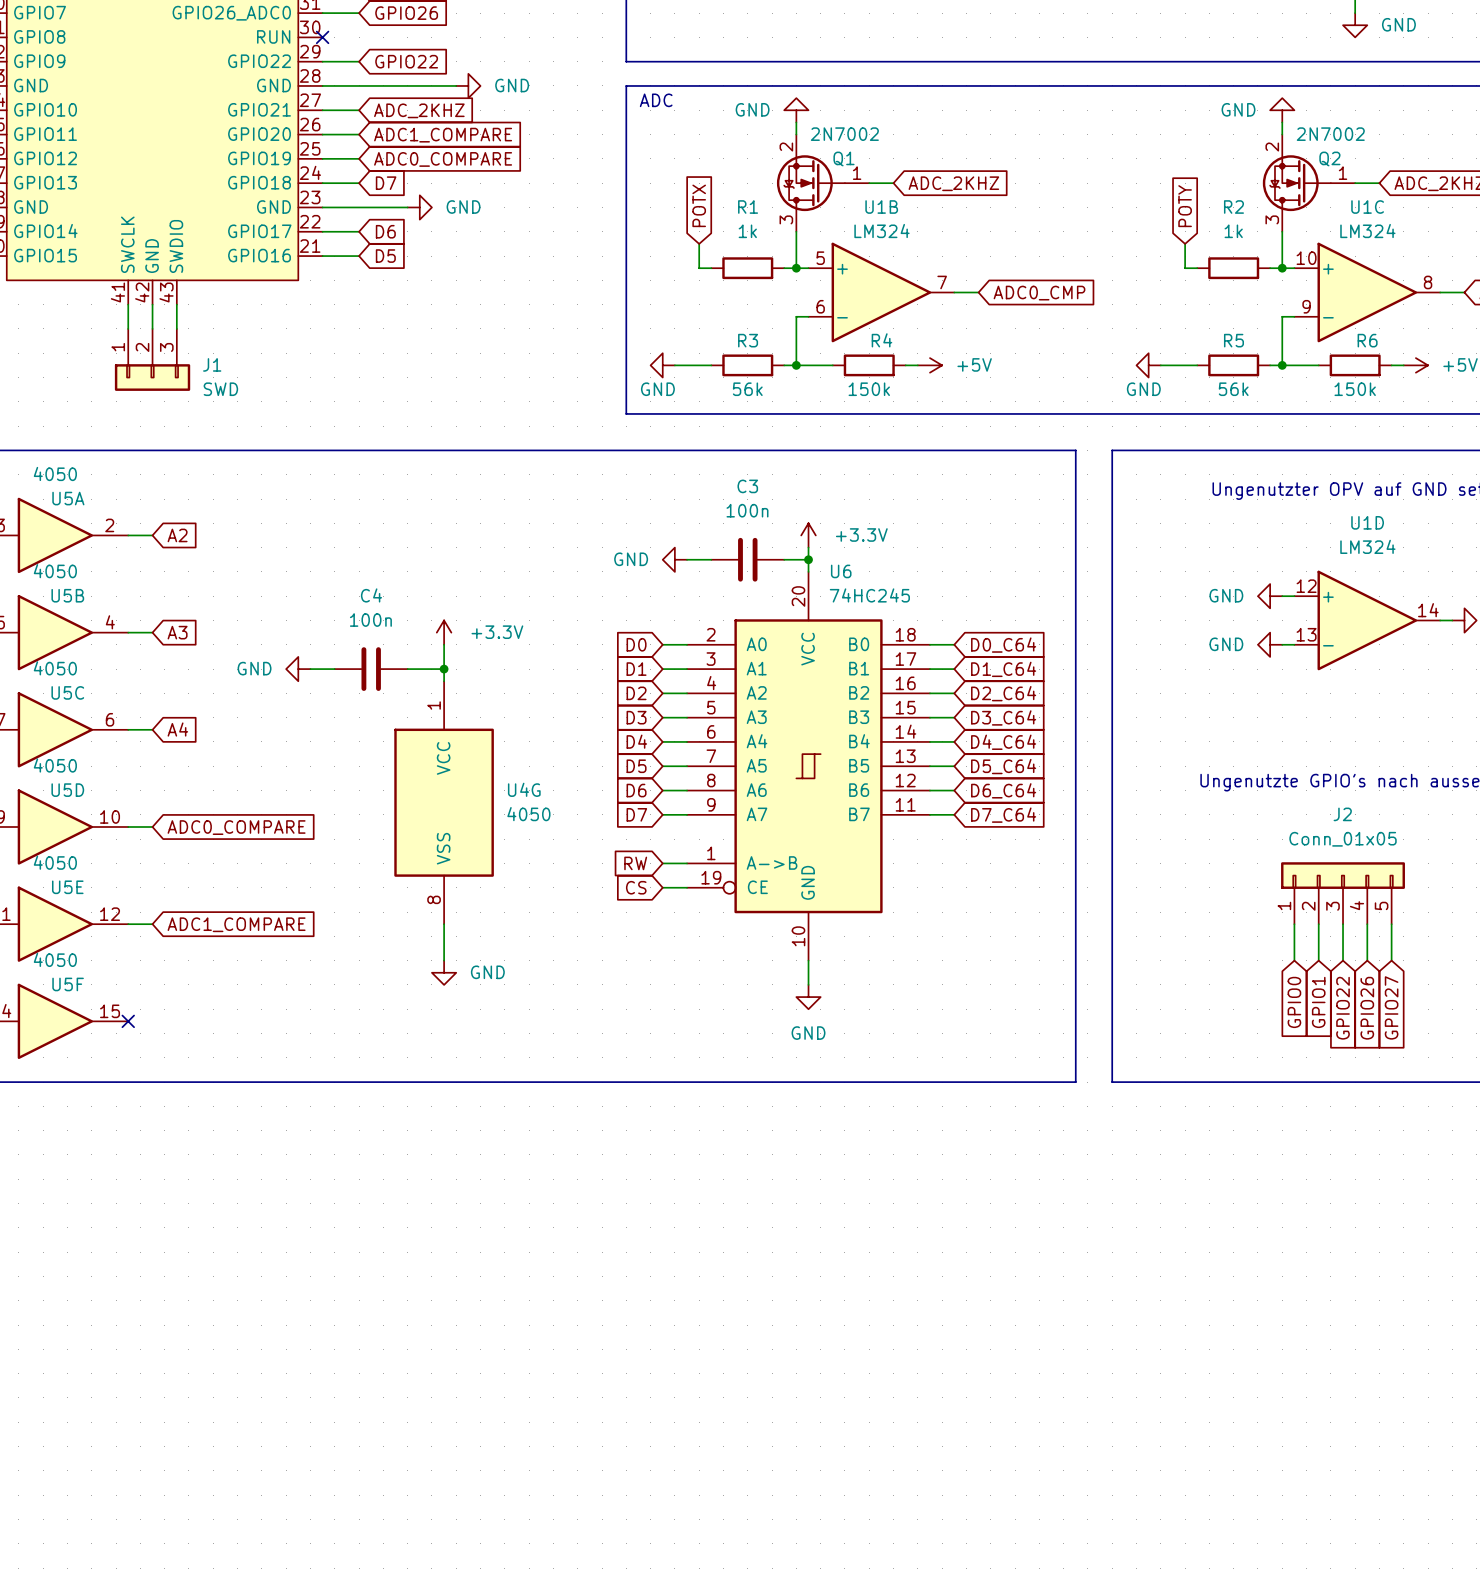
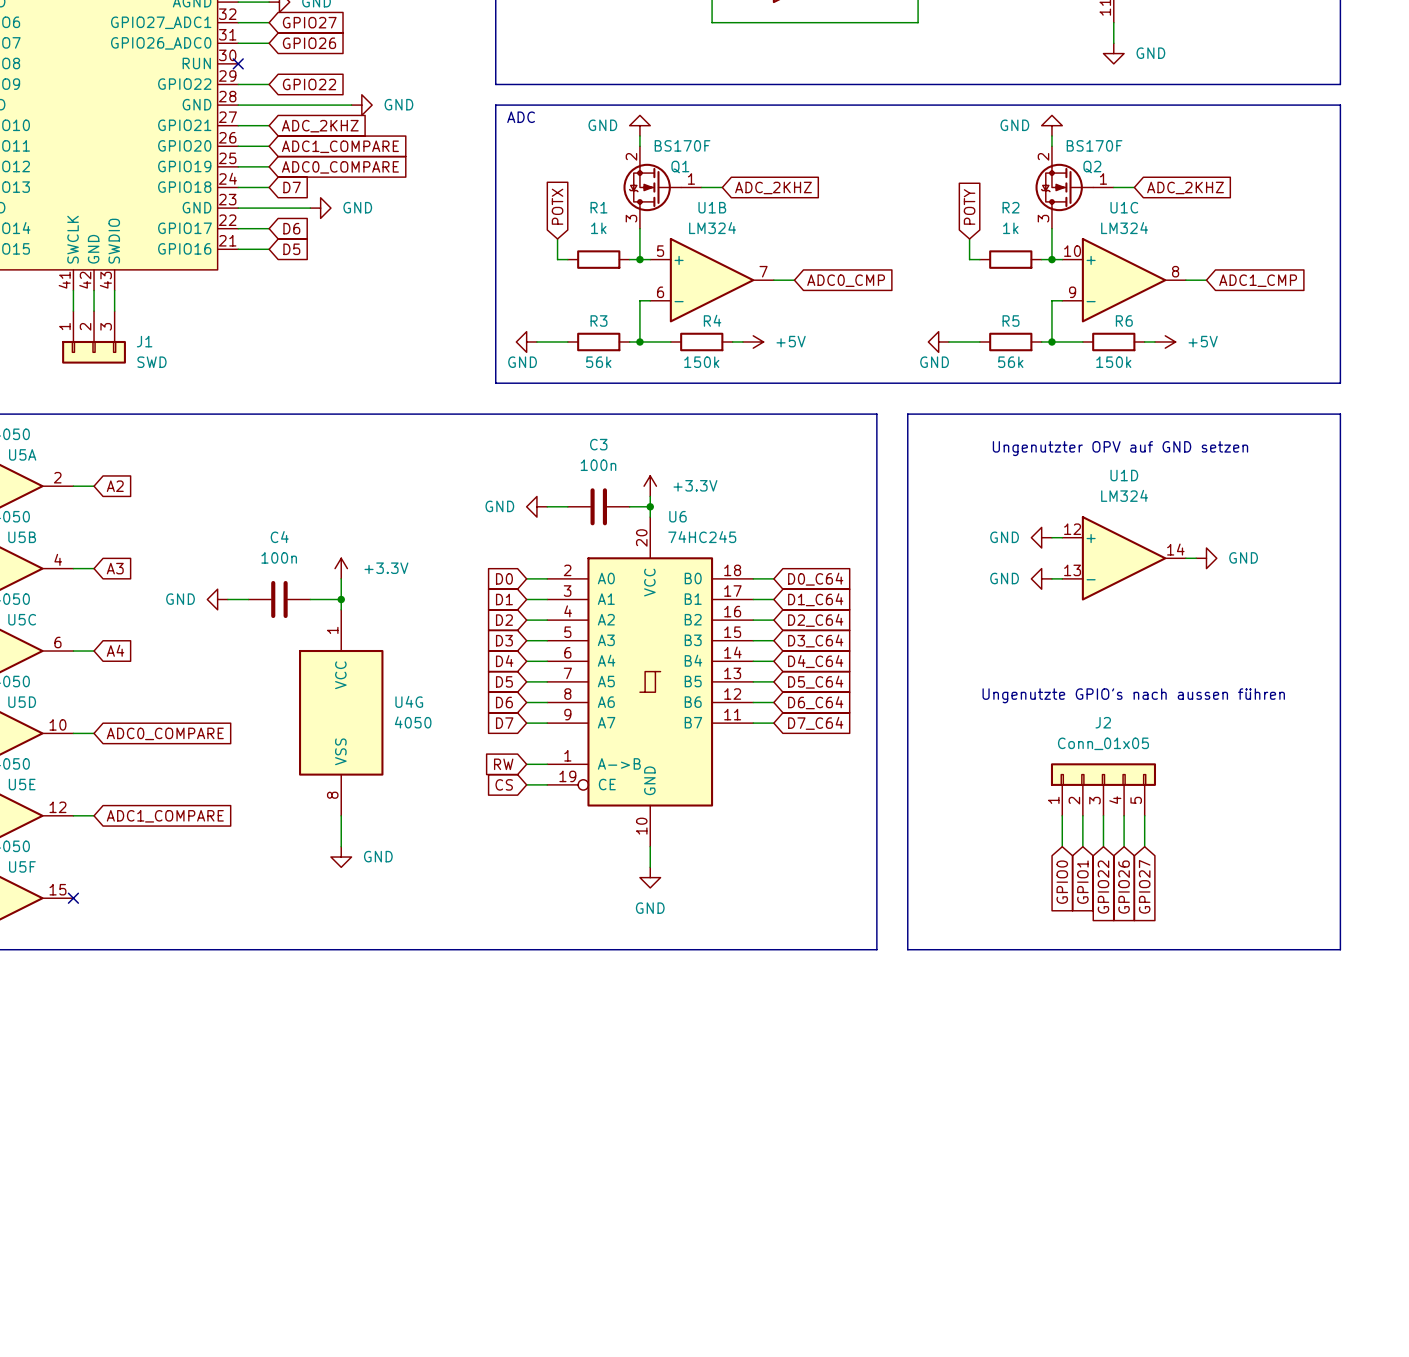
Q1 value: 2N7002 (844, 134) -> BS170F (682, 145)
Q2 value: 2N7002 (1330, 134) -> BS170F (1094, 145)

